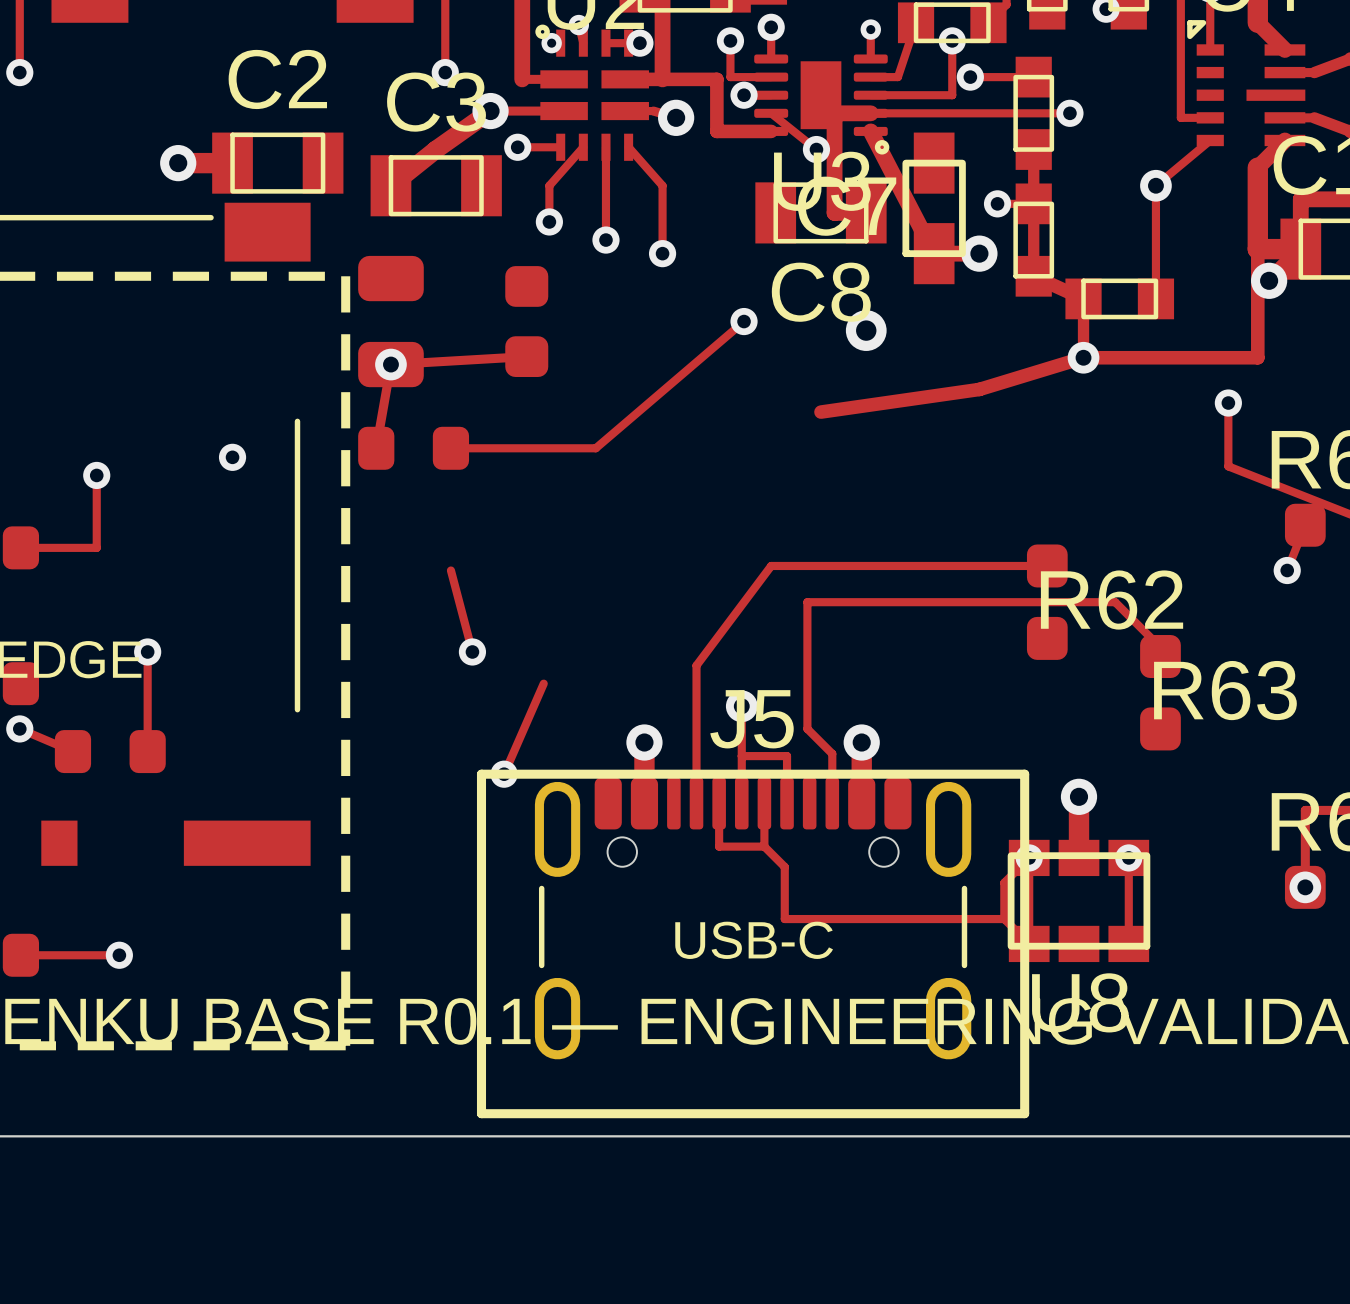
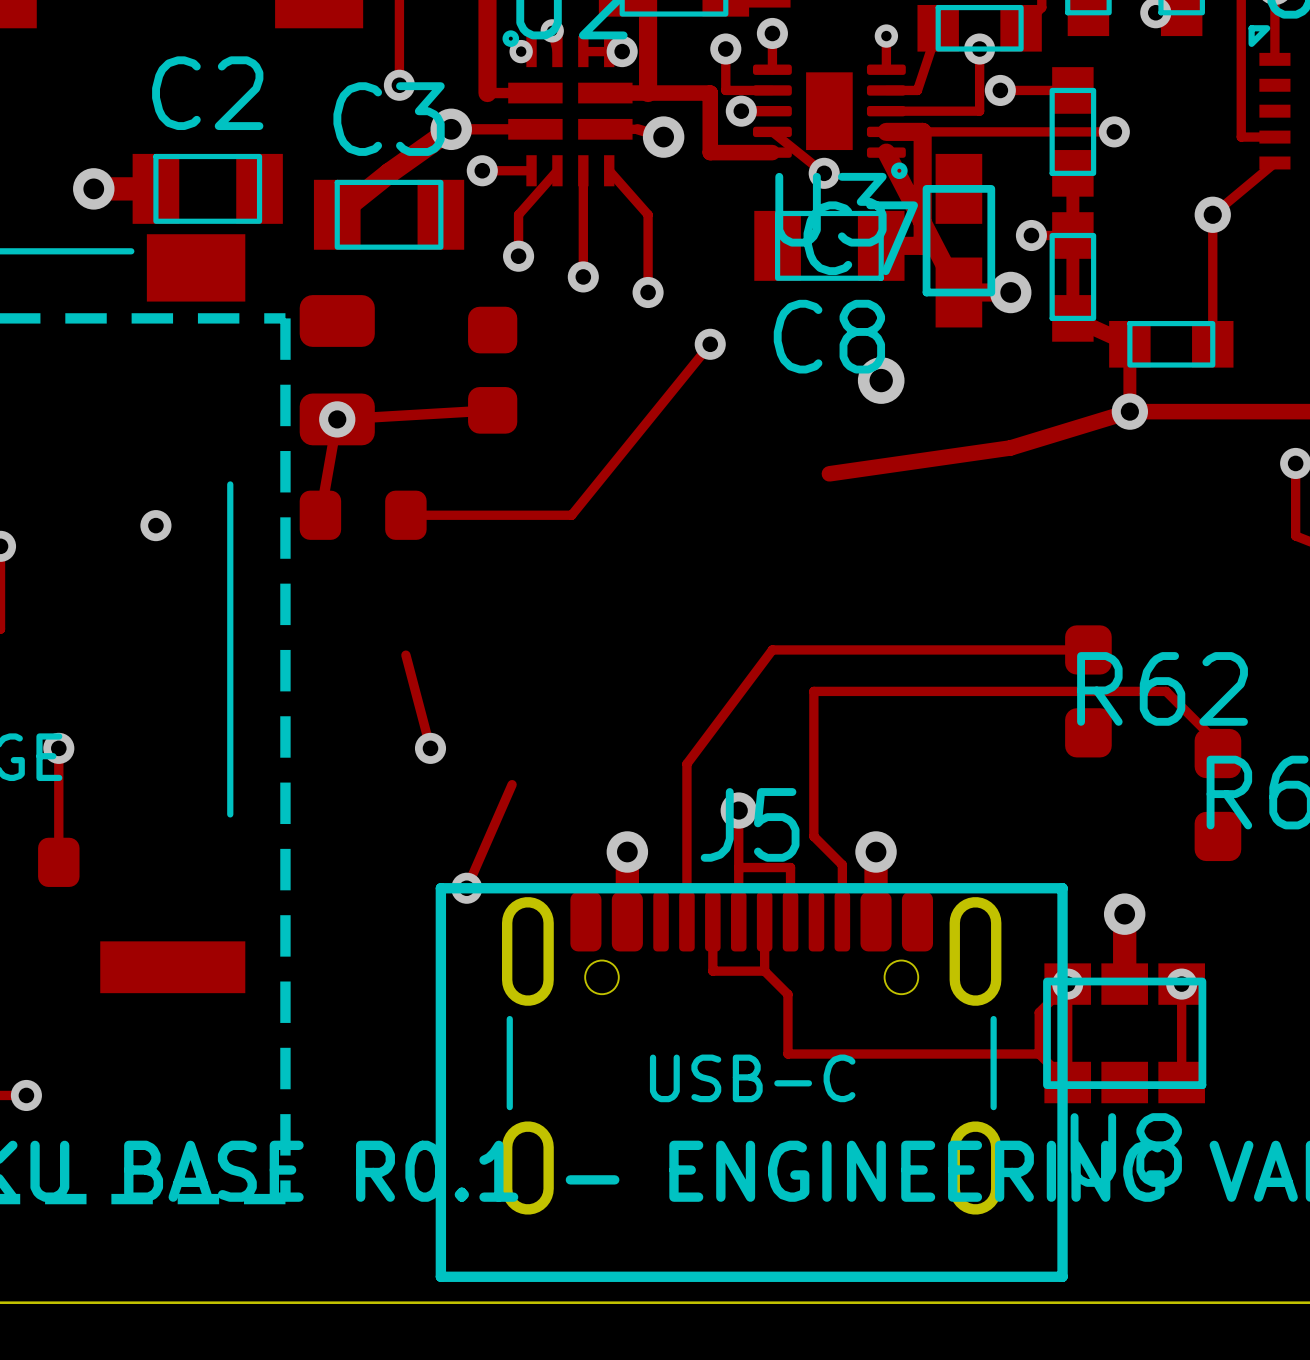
track: (870, 113) (834, 113) (834, 212) (866, 212) -> (886, 131) (922, 131) (922, 245) (881, 245)
track: (744, 321) (595, 448) -> (710, 344) (571, 515)
via position: (744, 321) -> (710, 344)

